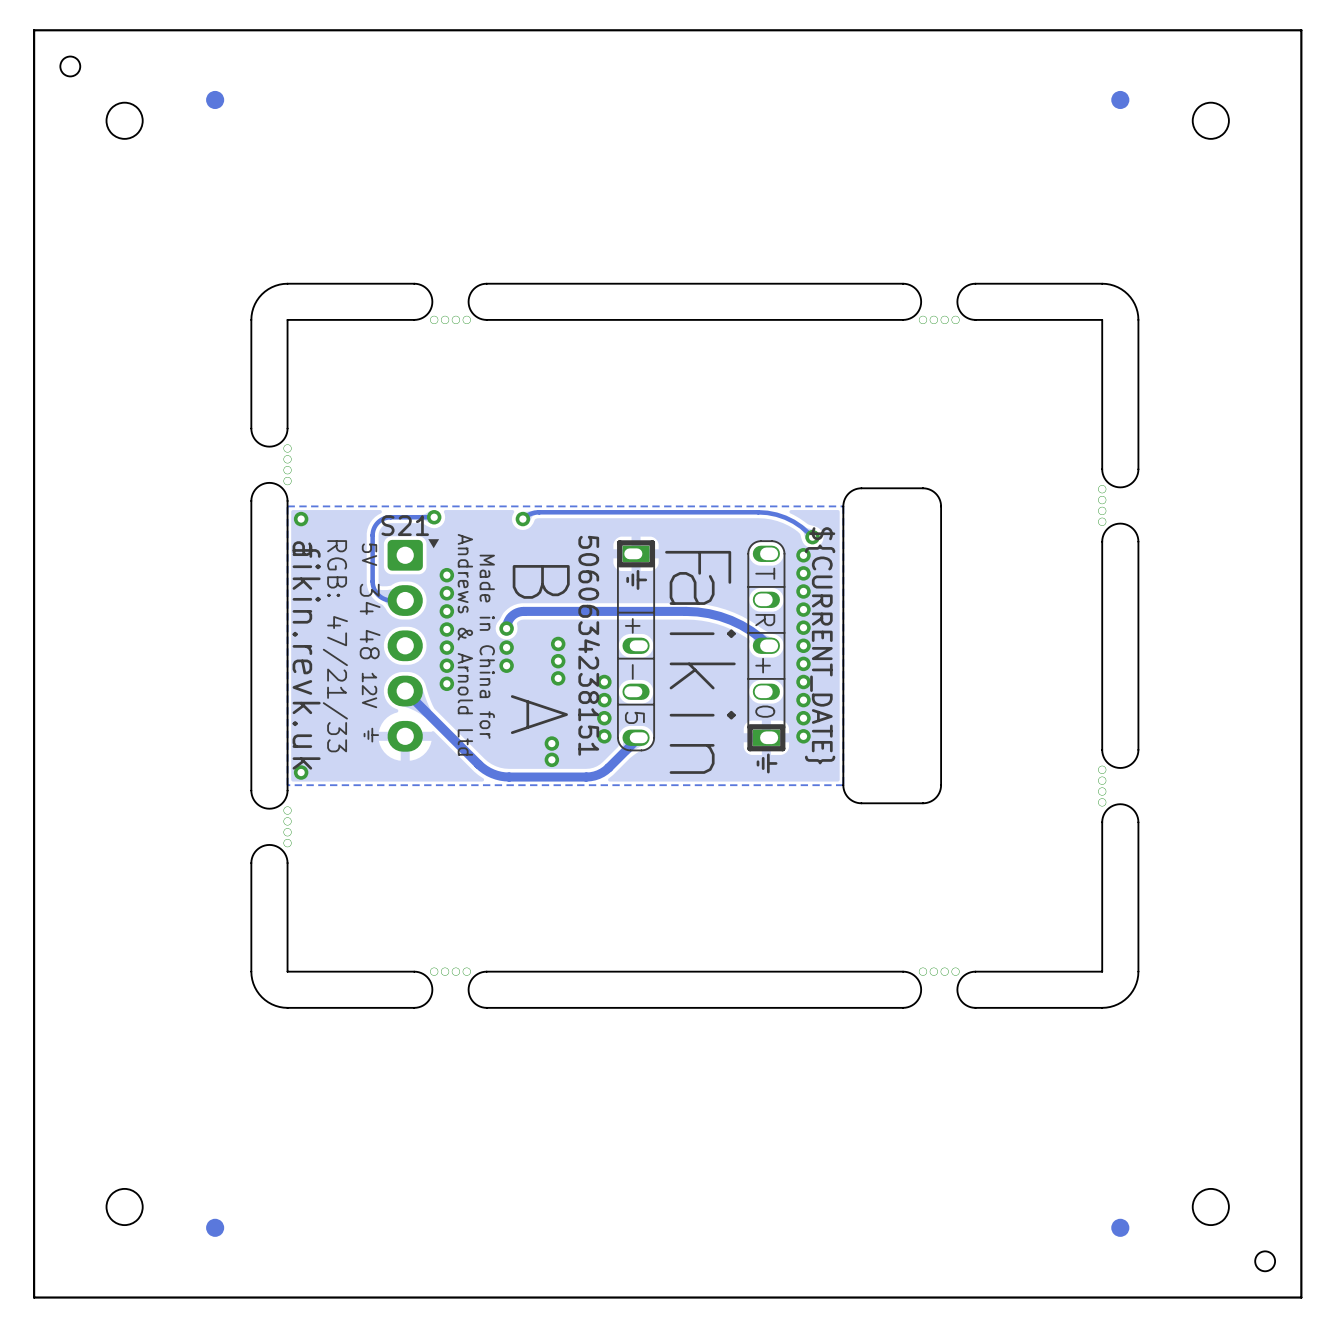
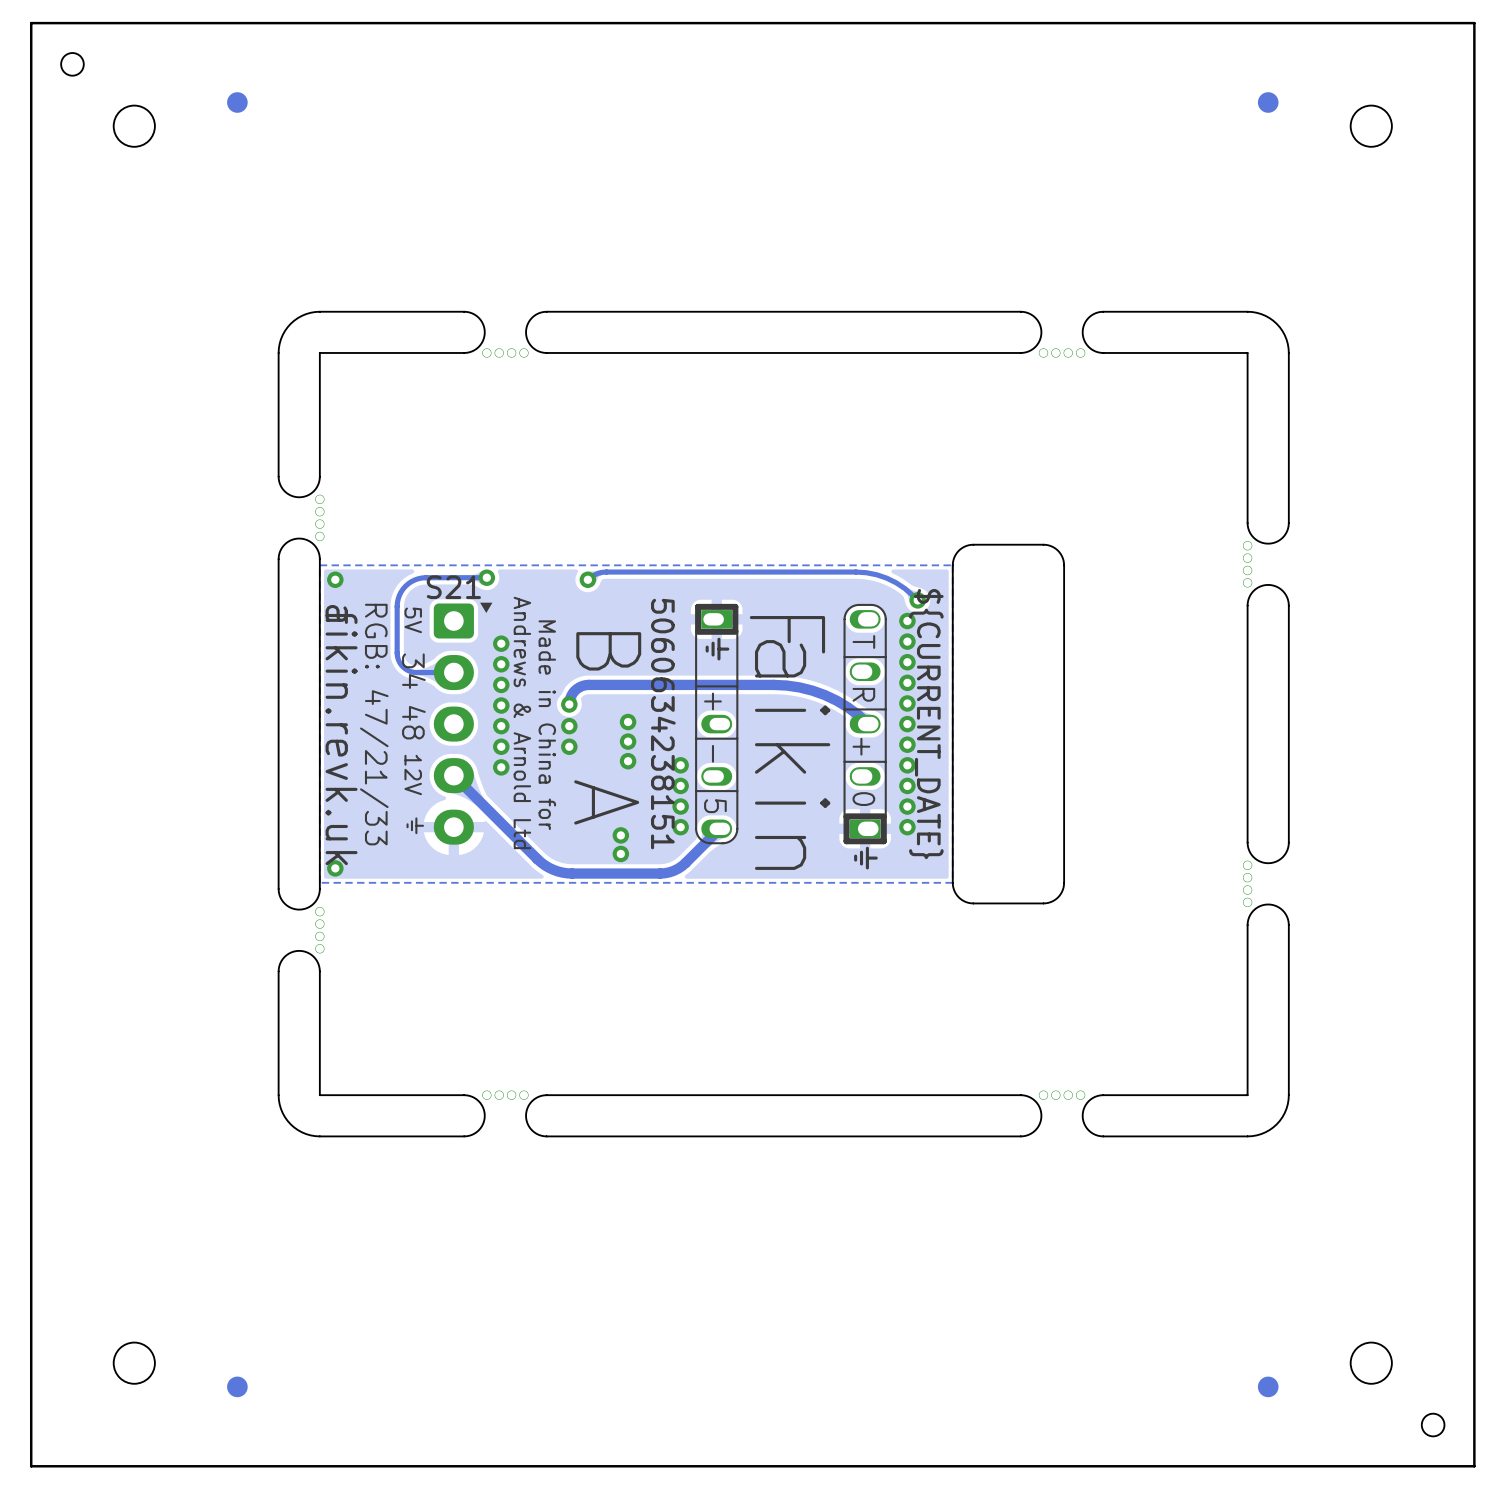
track: (390, 517) (379, 521) (373, 531) (372, 581) (378, 594) (391, 600) -> (437, 577) (414, 579) (401, 592) (397, 606) (397, 652) (401, 664) (409, 671) (438, 672)

